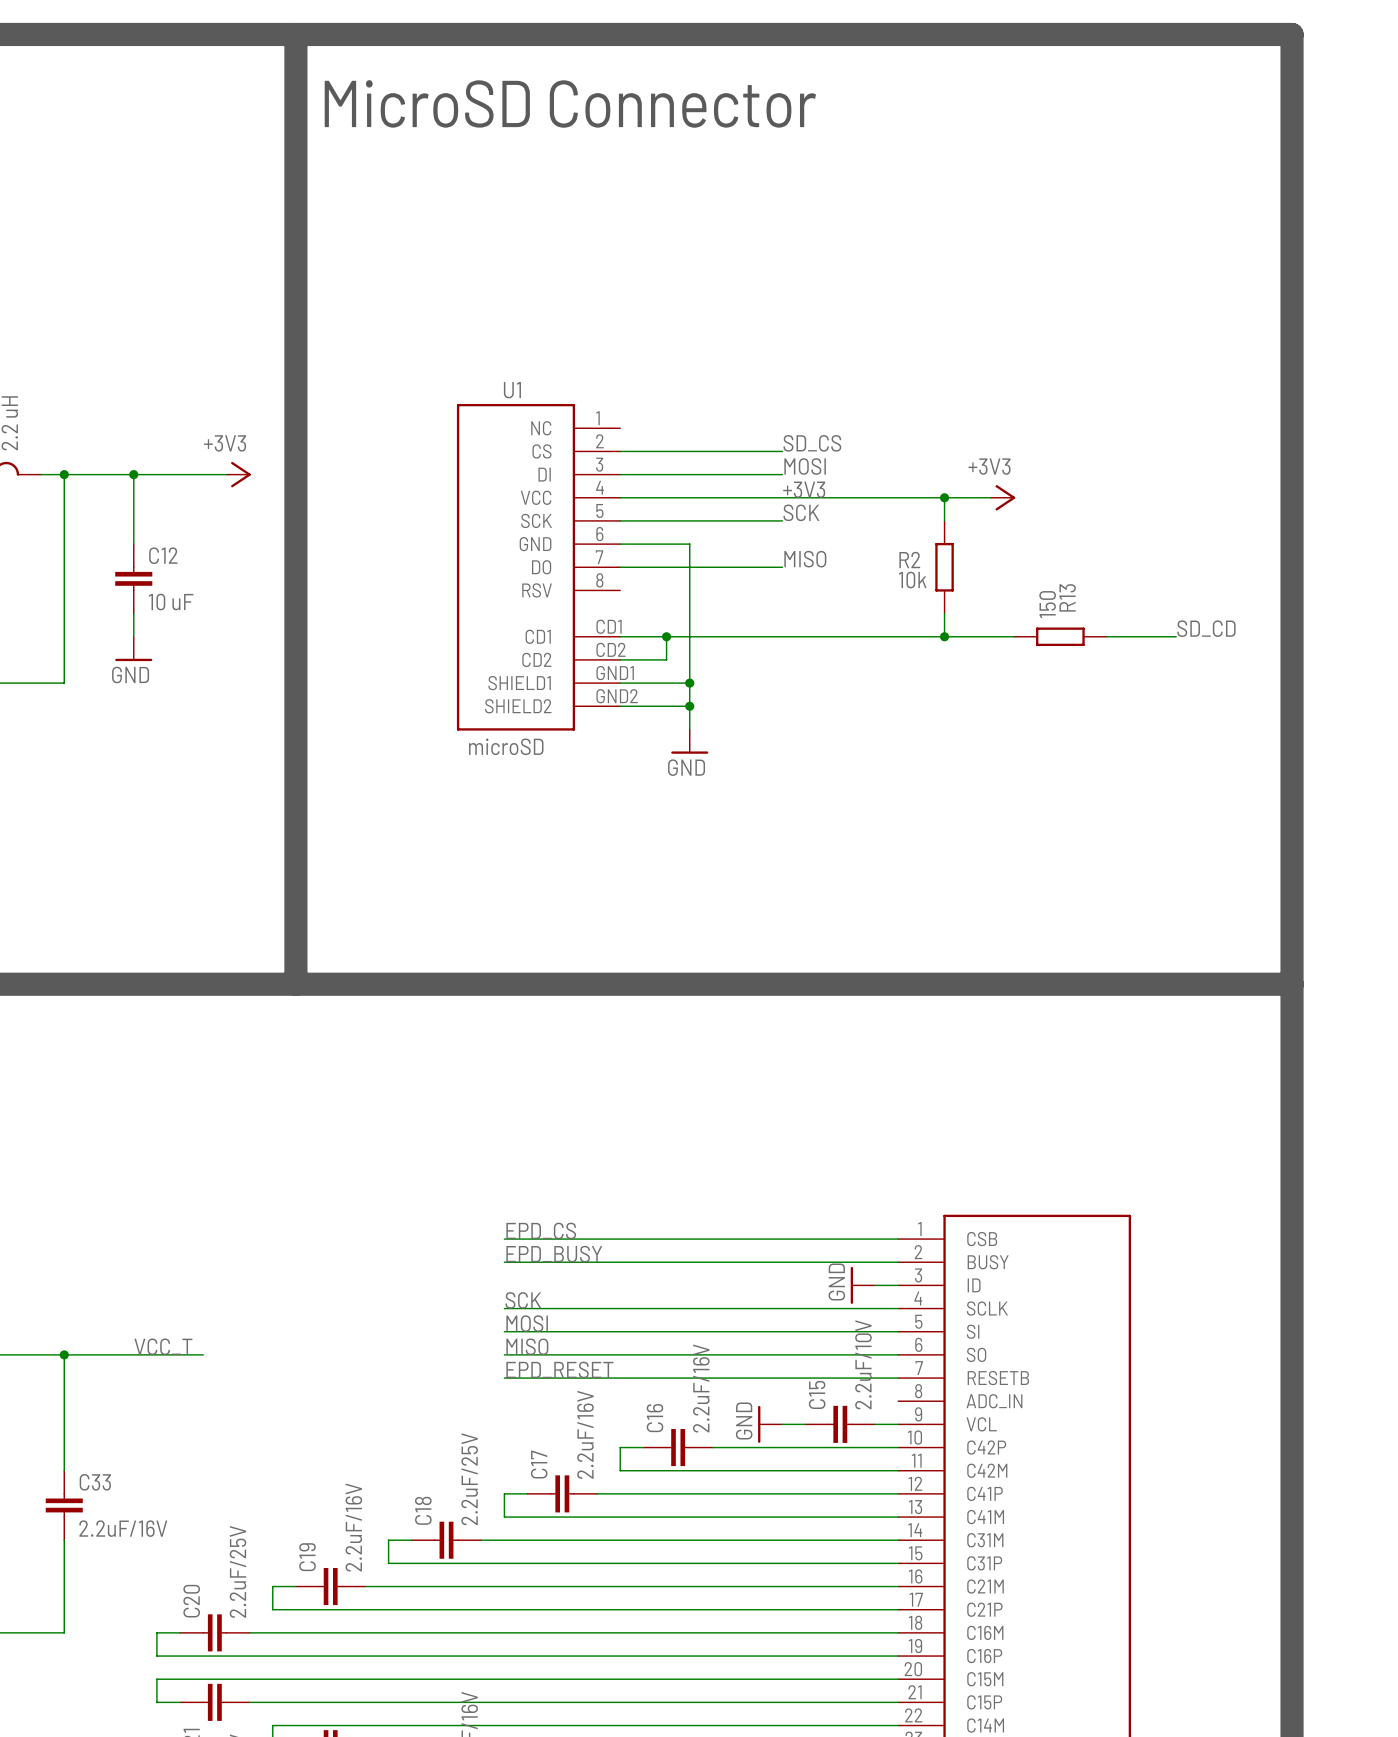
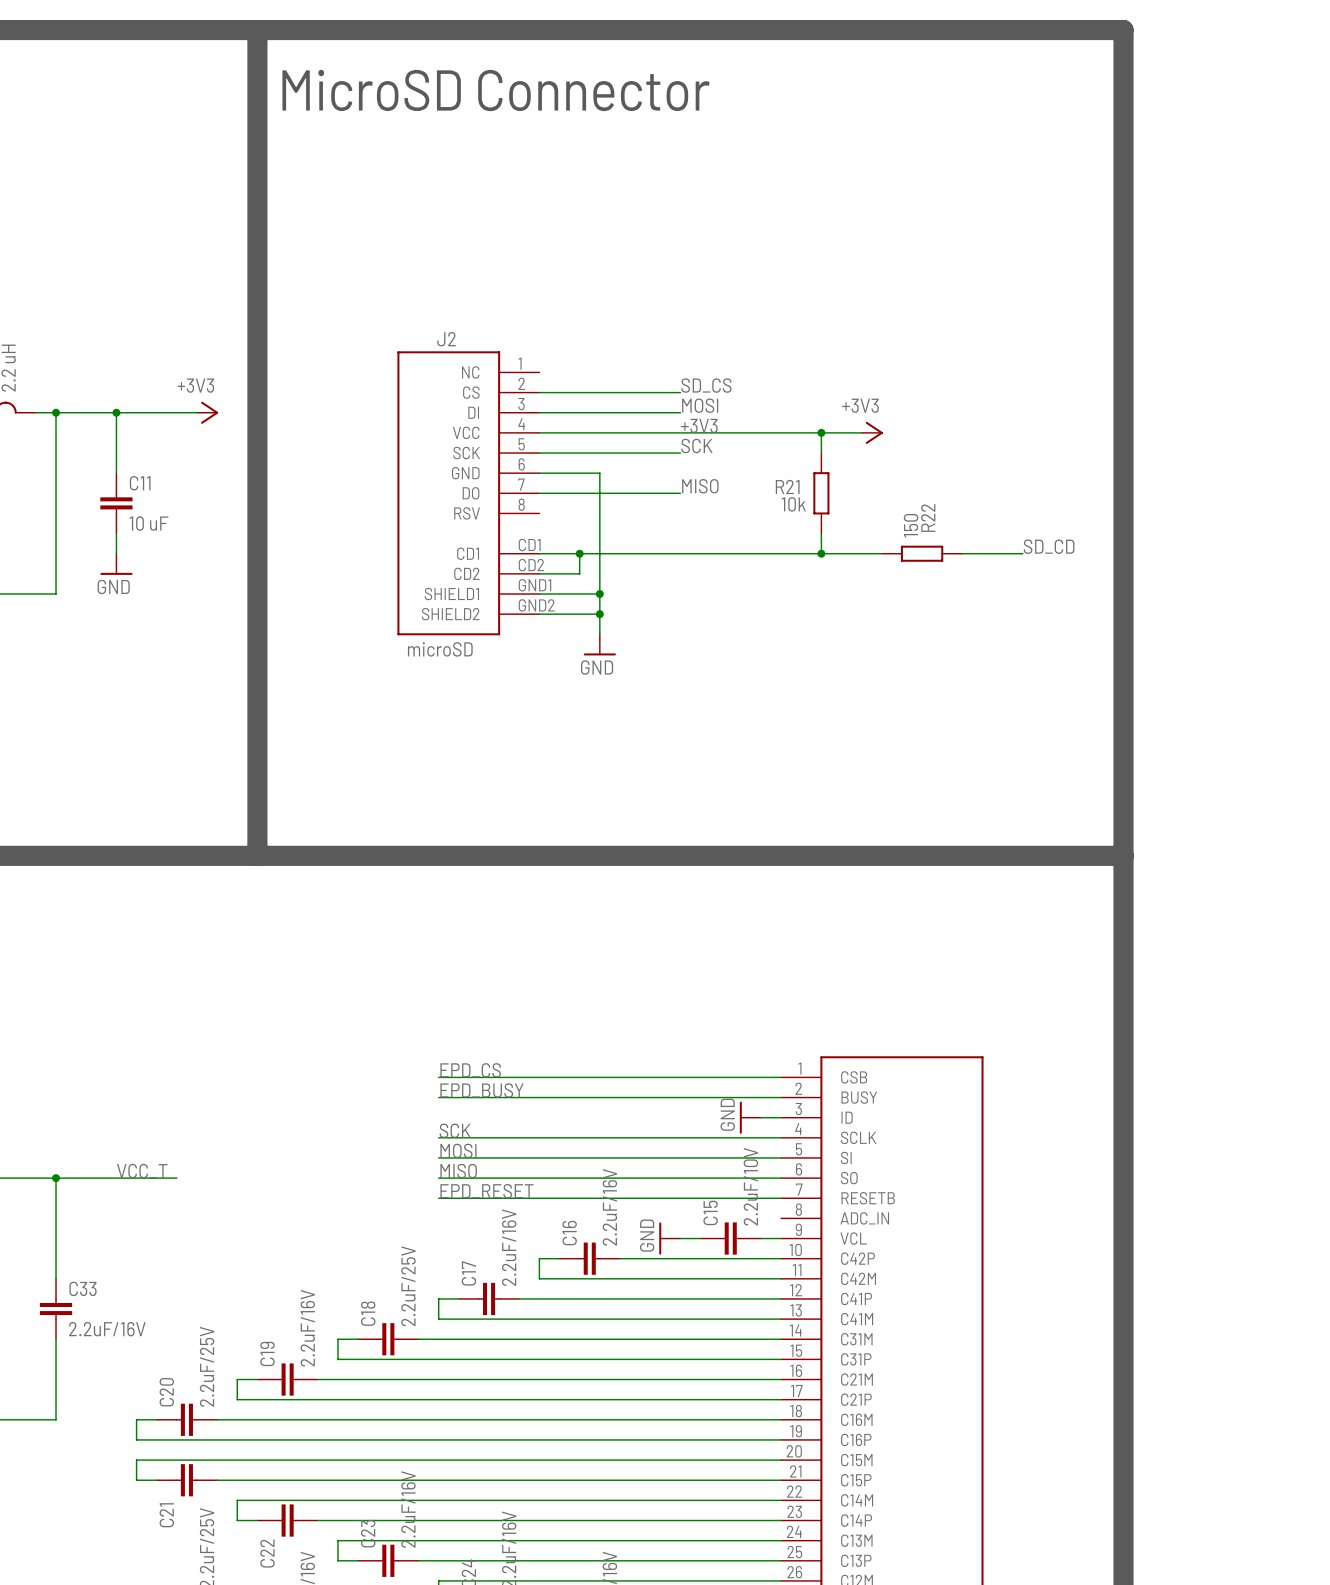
U1 name: U1 (512, 390) -> J2 (446, 339)
C12 name: C12 (163, 555) -> C11 (140, 483)
R2 name: R2 (909, 560) -> R21 (787, 486)
R13 name: R13 (1067, 597) -> R22 (928, 517)

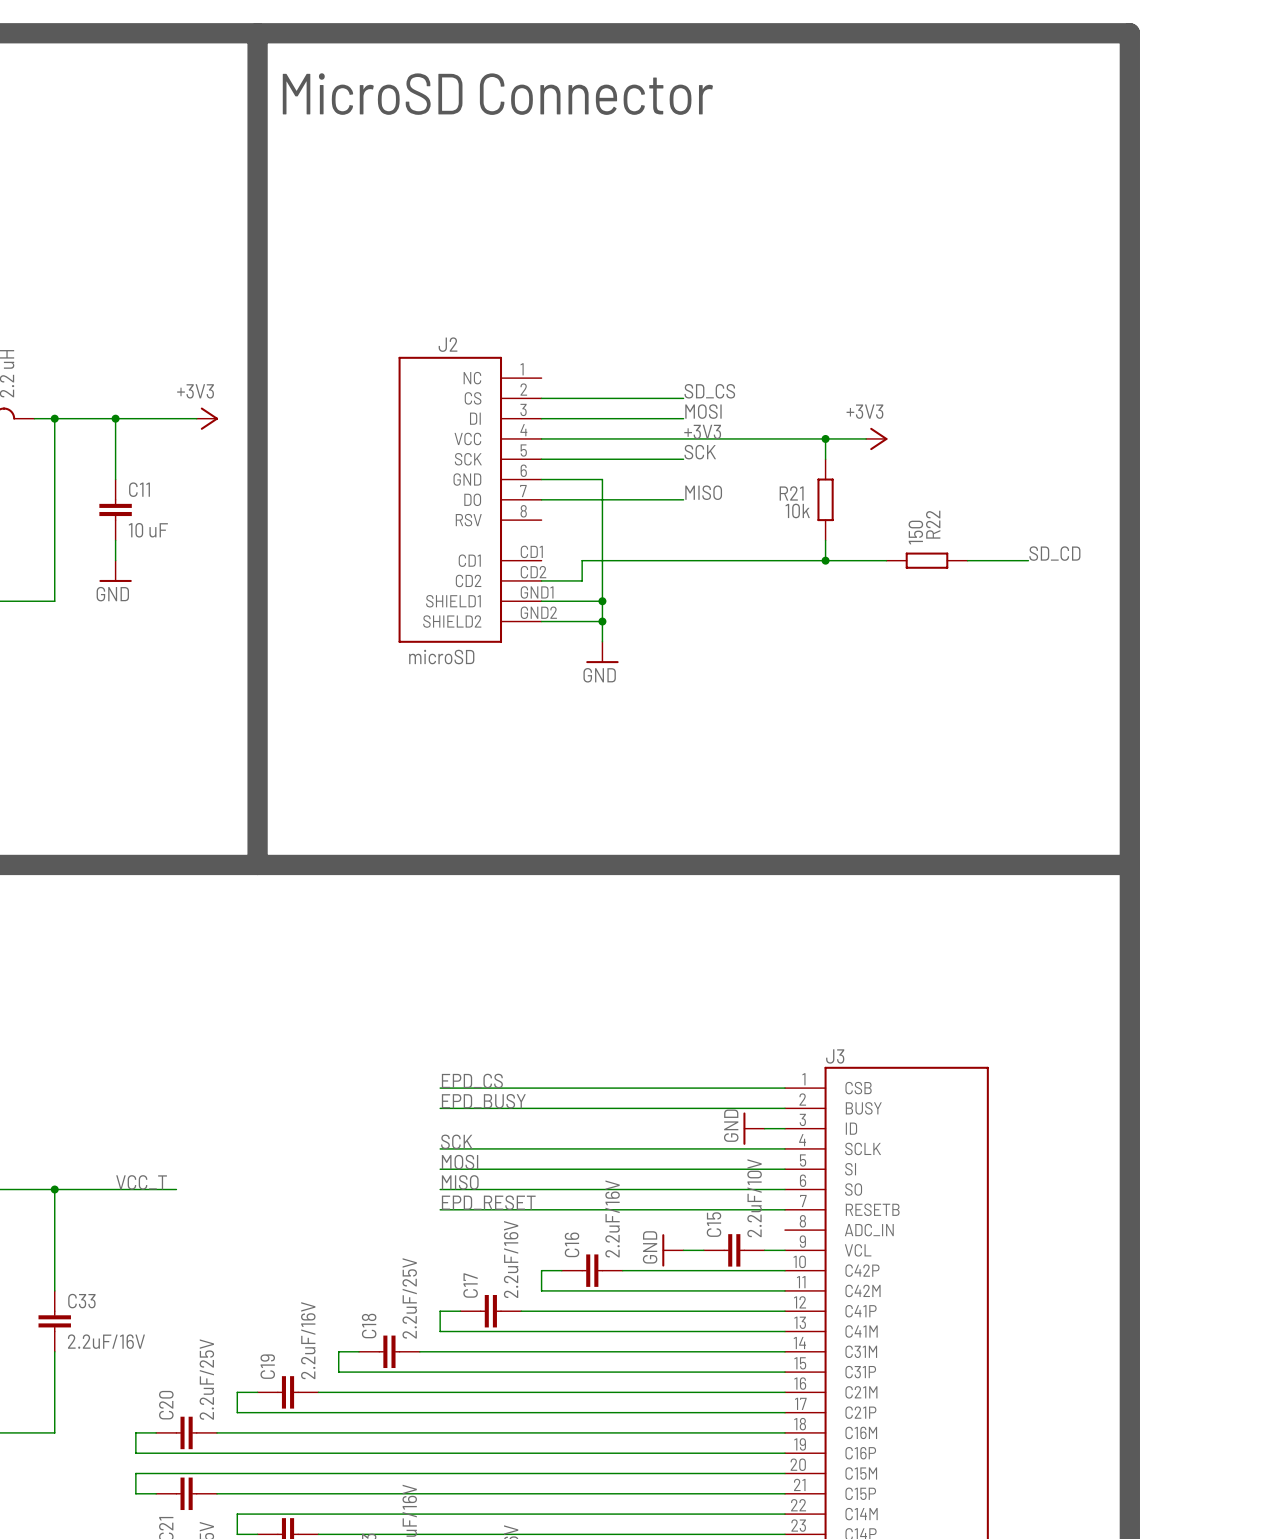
wire: (539, 553) (579, 553) -> none
junction: (579, 553) -> none
J3 name: none -> J3 (835, 1056)

